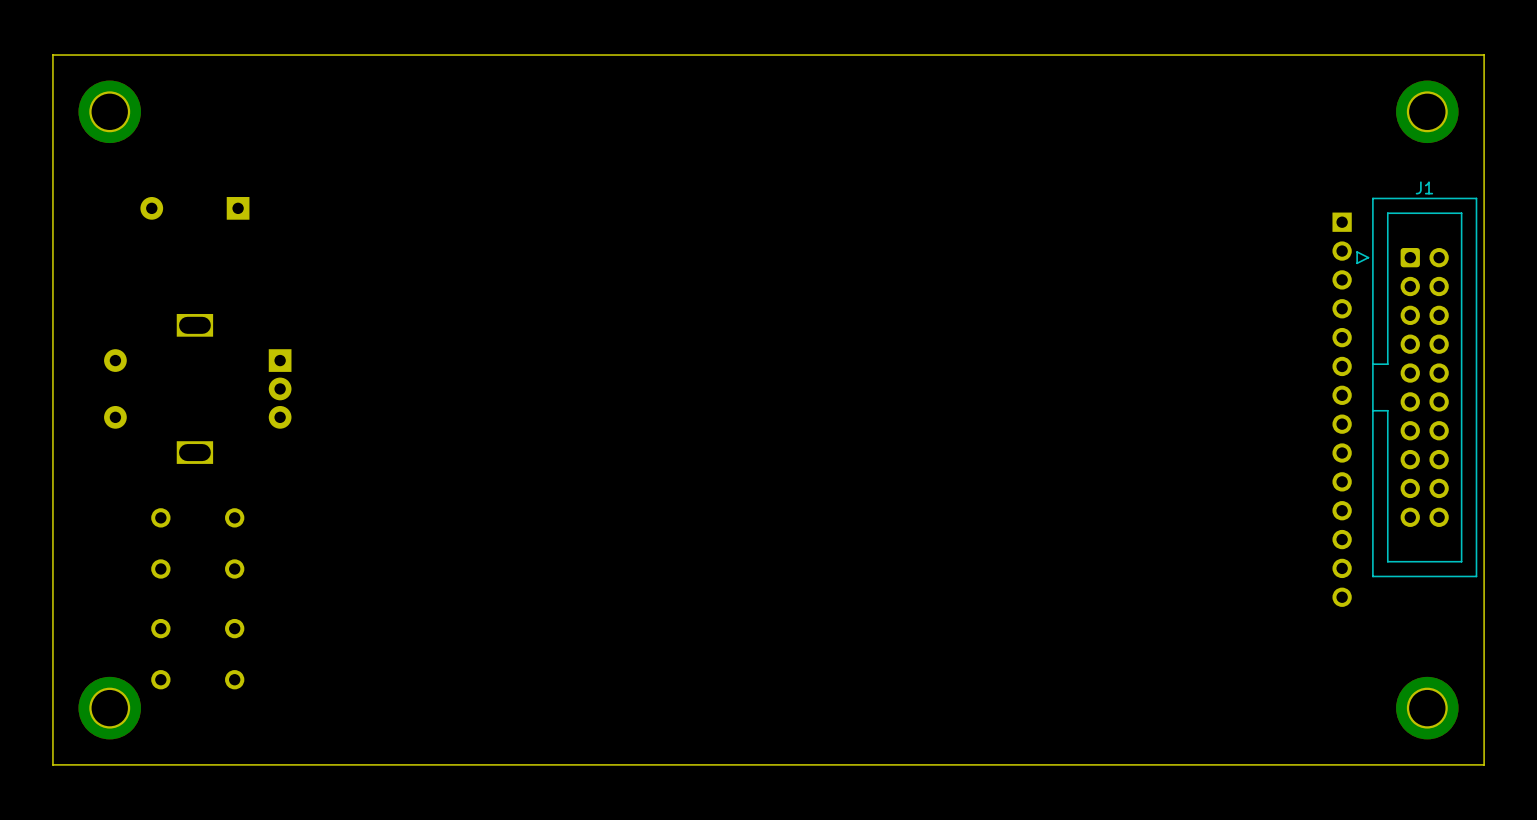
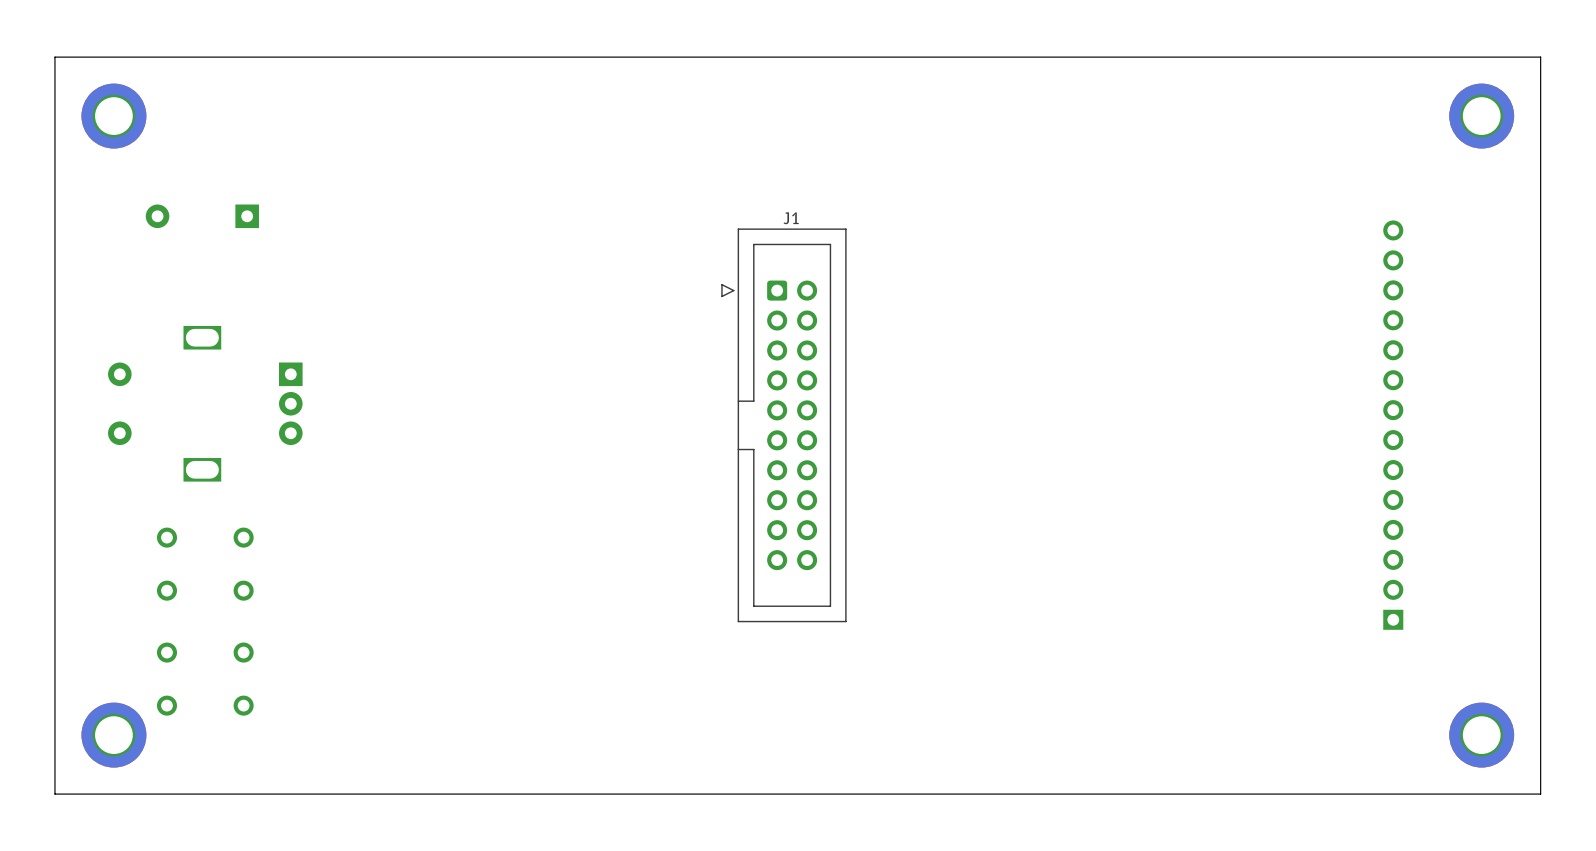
J1 position: (1416, 387) -> (783, 425)
part rotation: 0° (1342, 409) -> 180° (1393, 425)

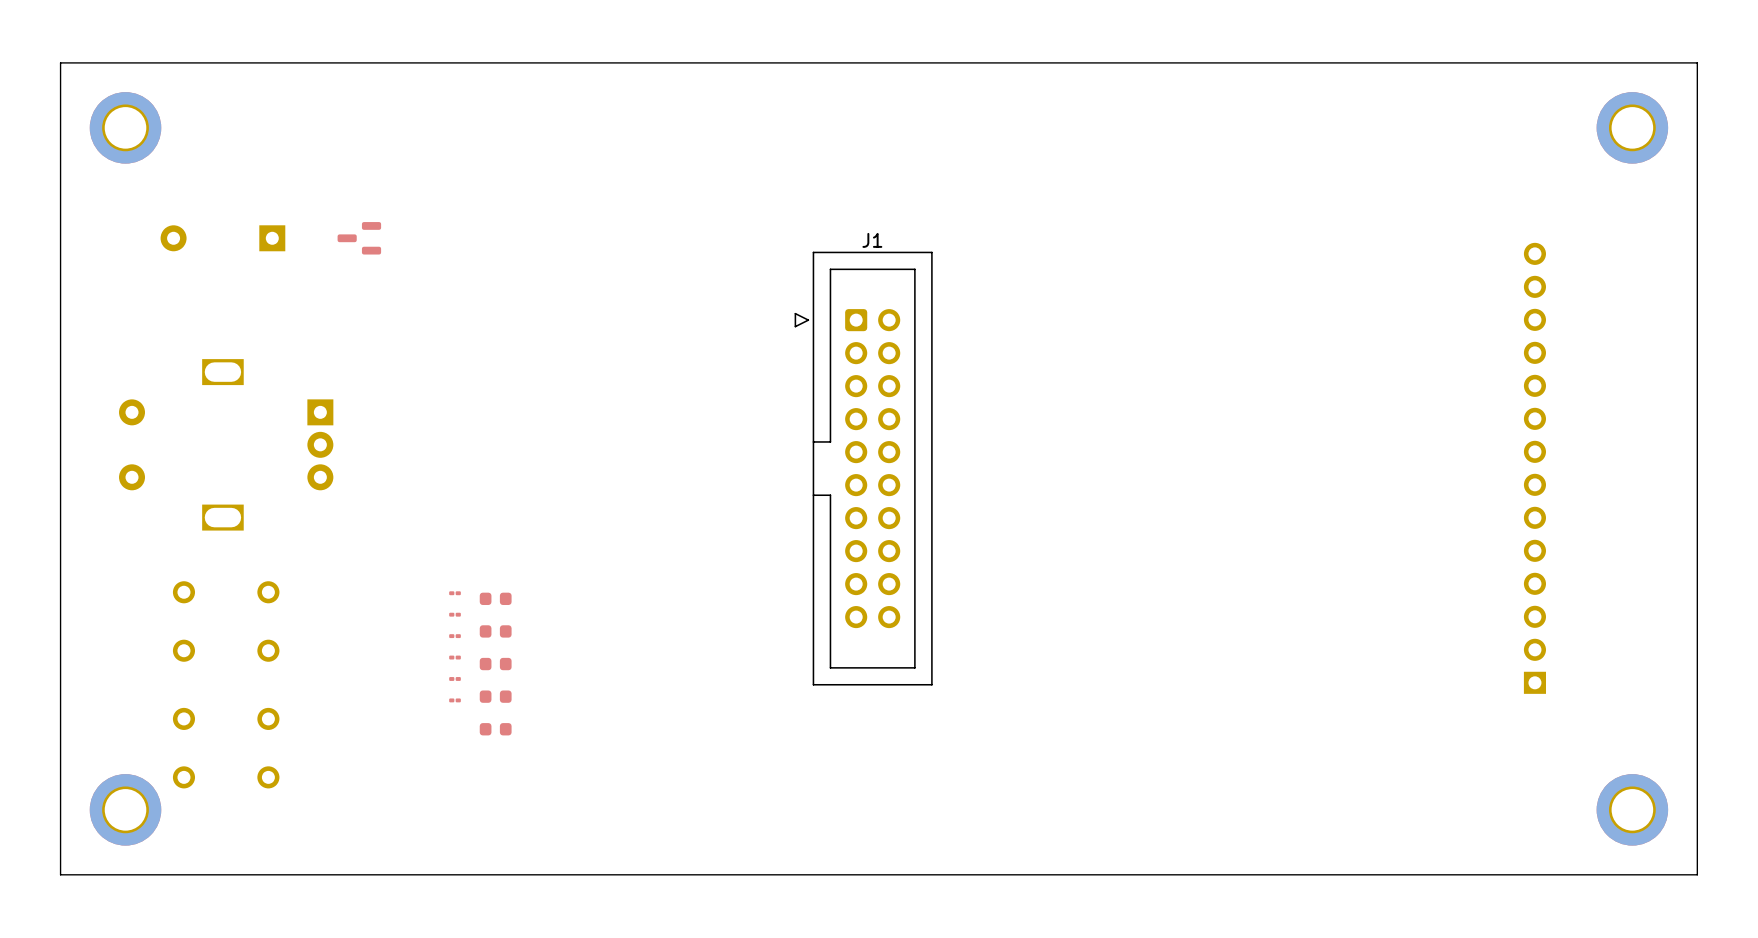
part: none -> (359, 238)
part: none -> (455, 593)
part: none -> (495, 598)
part: none -> (455, 614)
part: none -> (495, 631)
part: none -> (455, 636)
part: none -> (455, 657)
part: none -> (495, 664)
part: none -> (455, 678)
part: none -> (495, 696)
part: none -> (455, 700)
part: none -> (495, 729)

